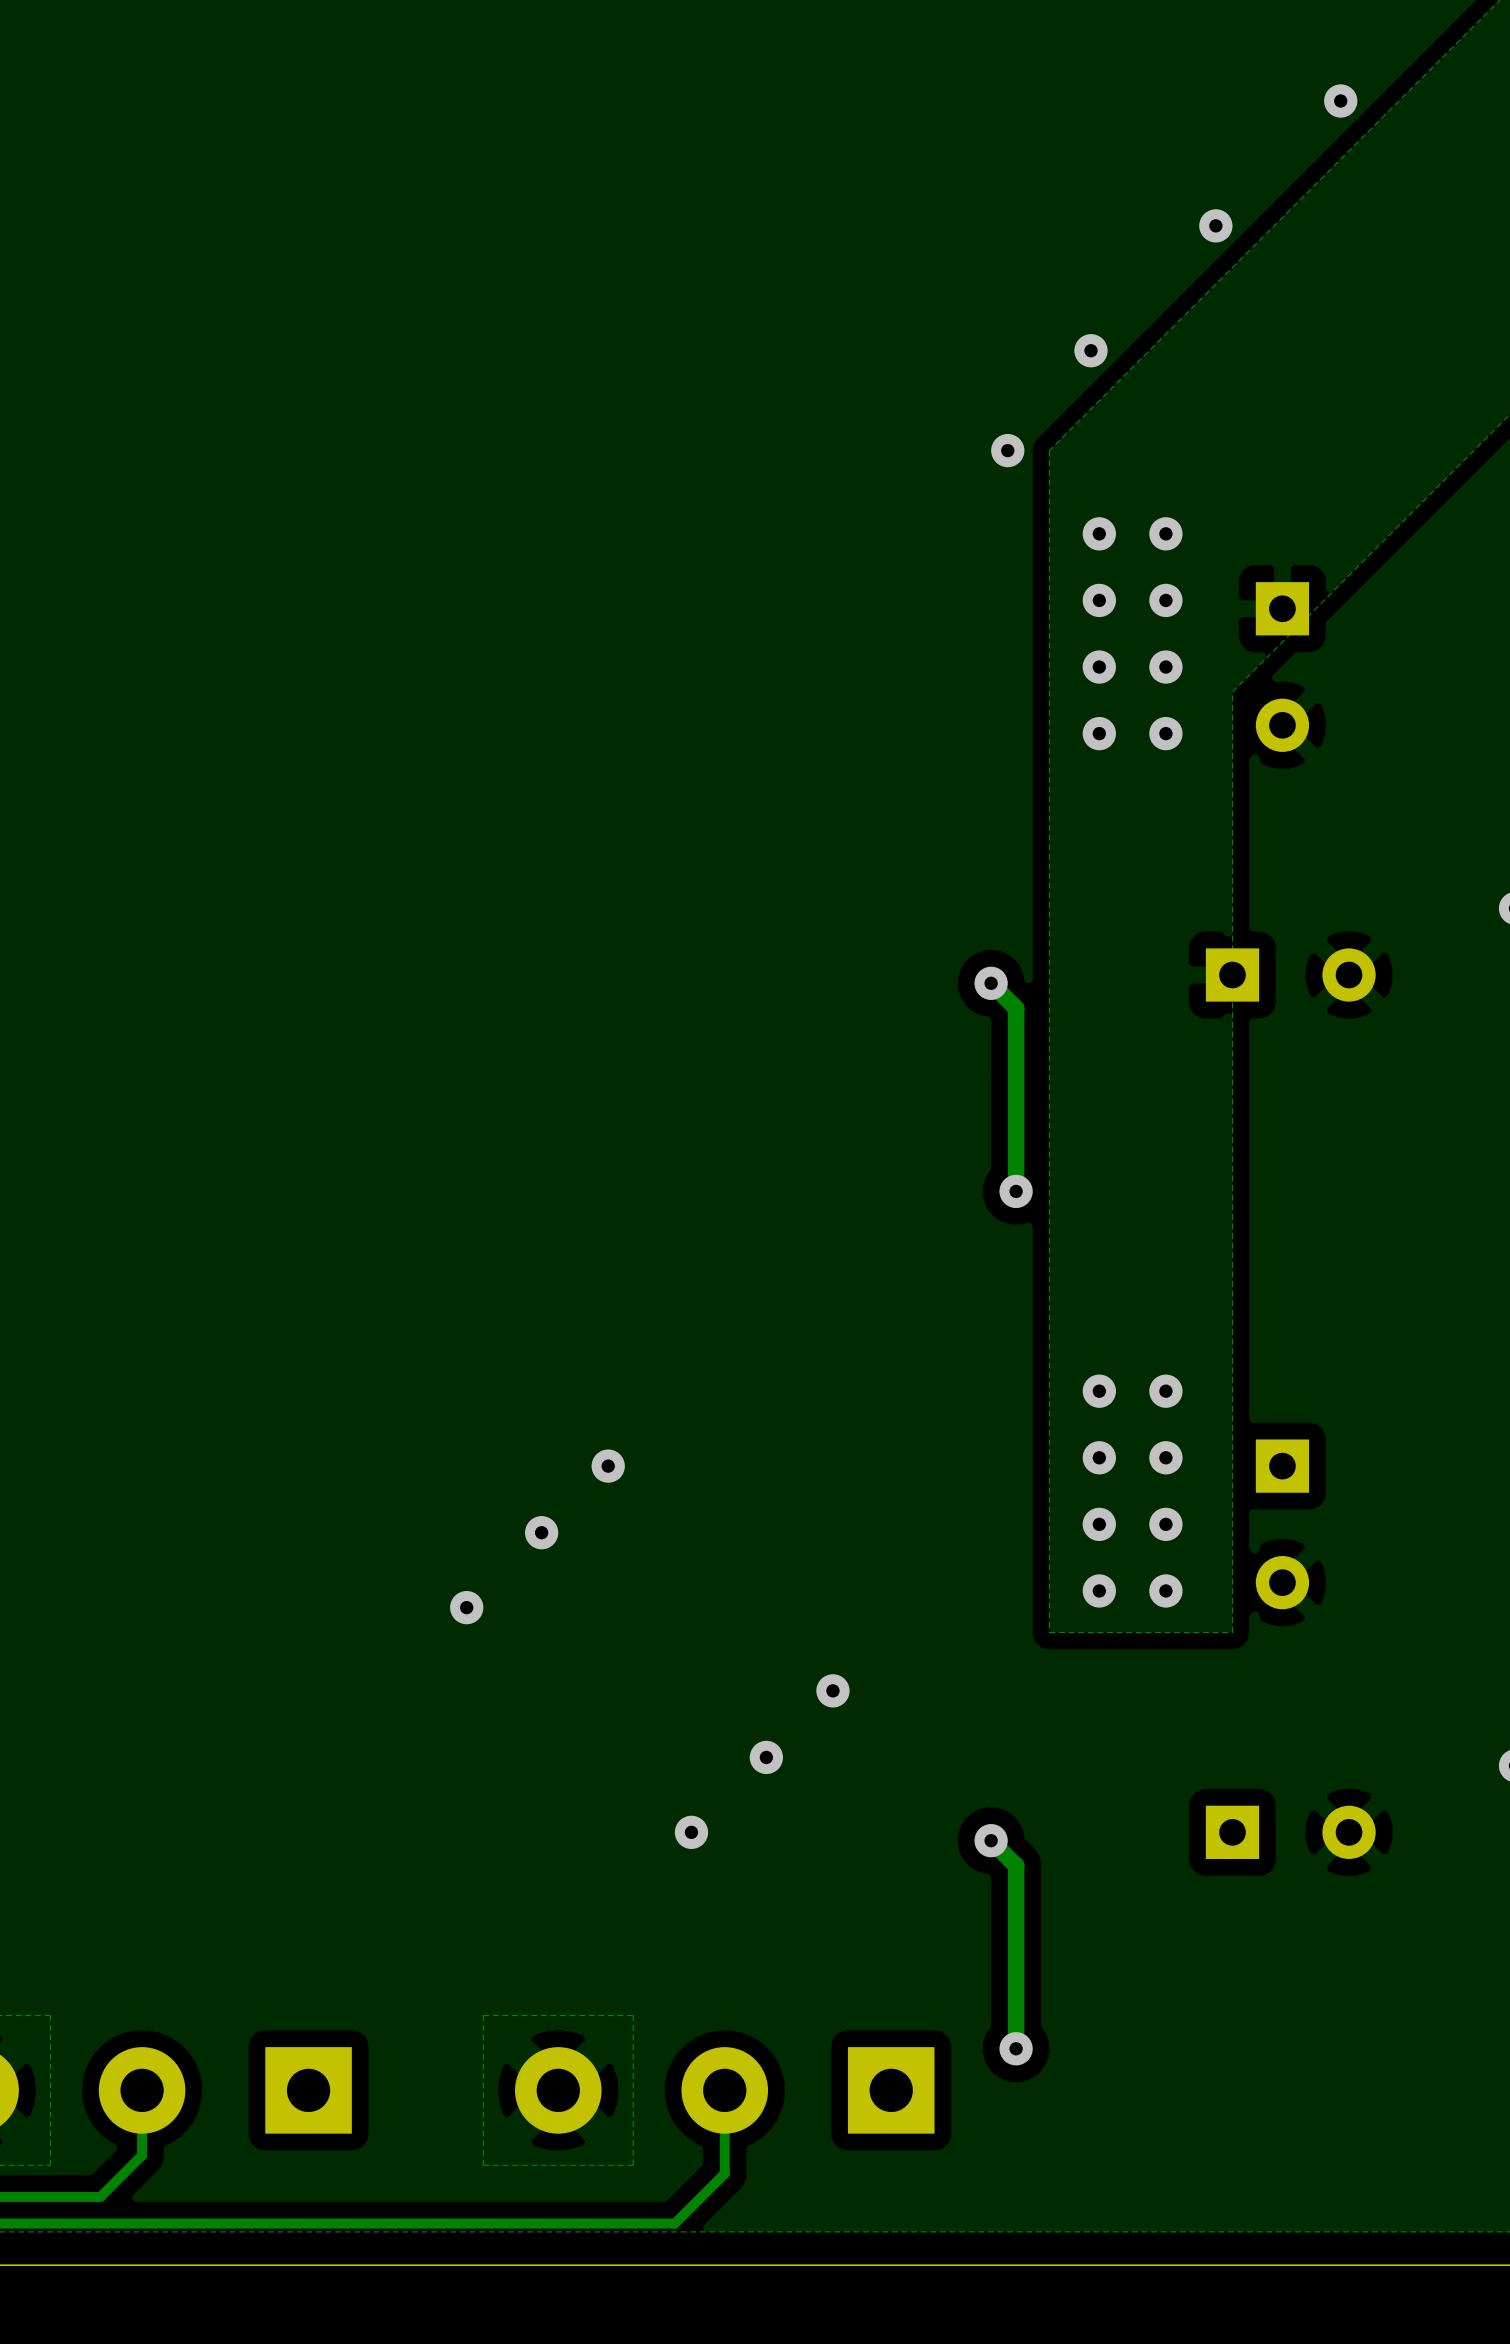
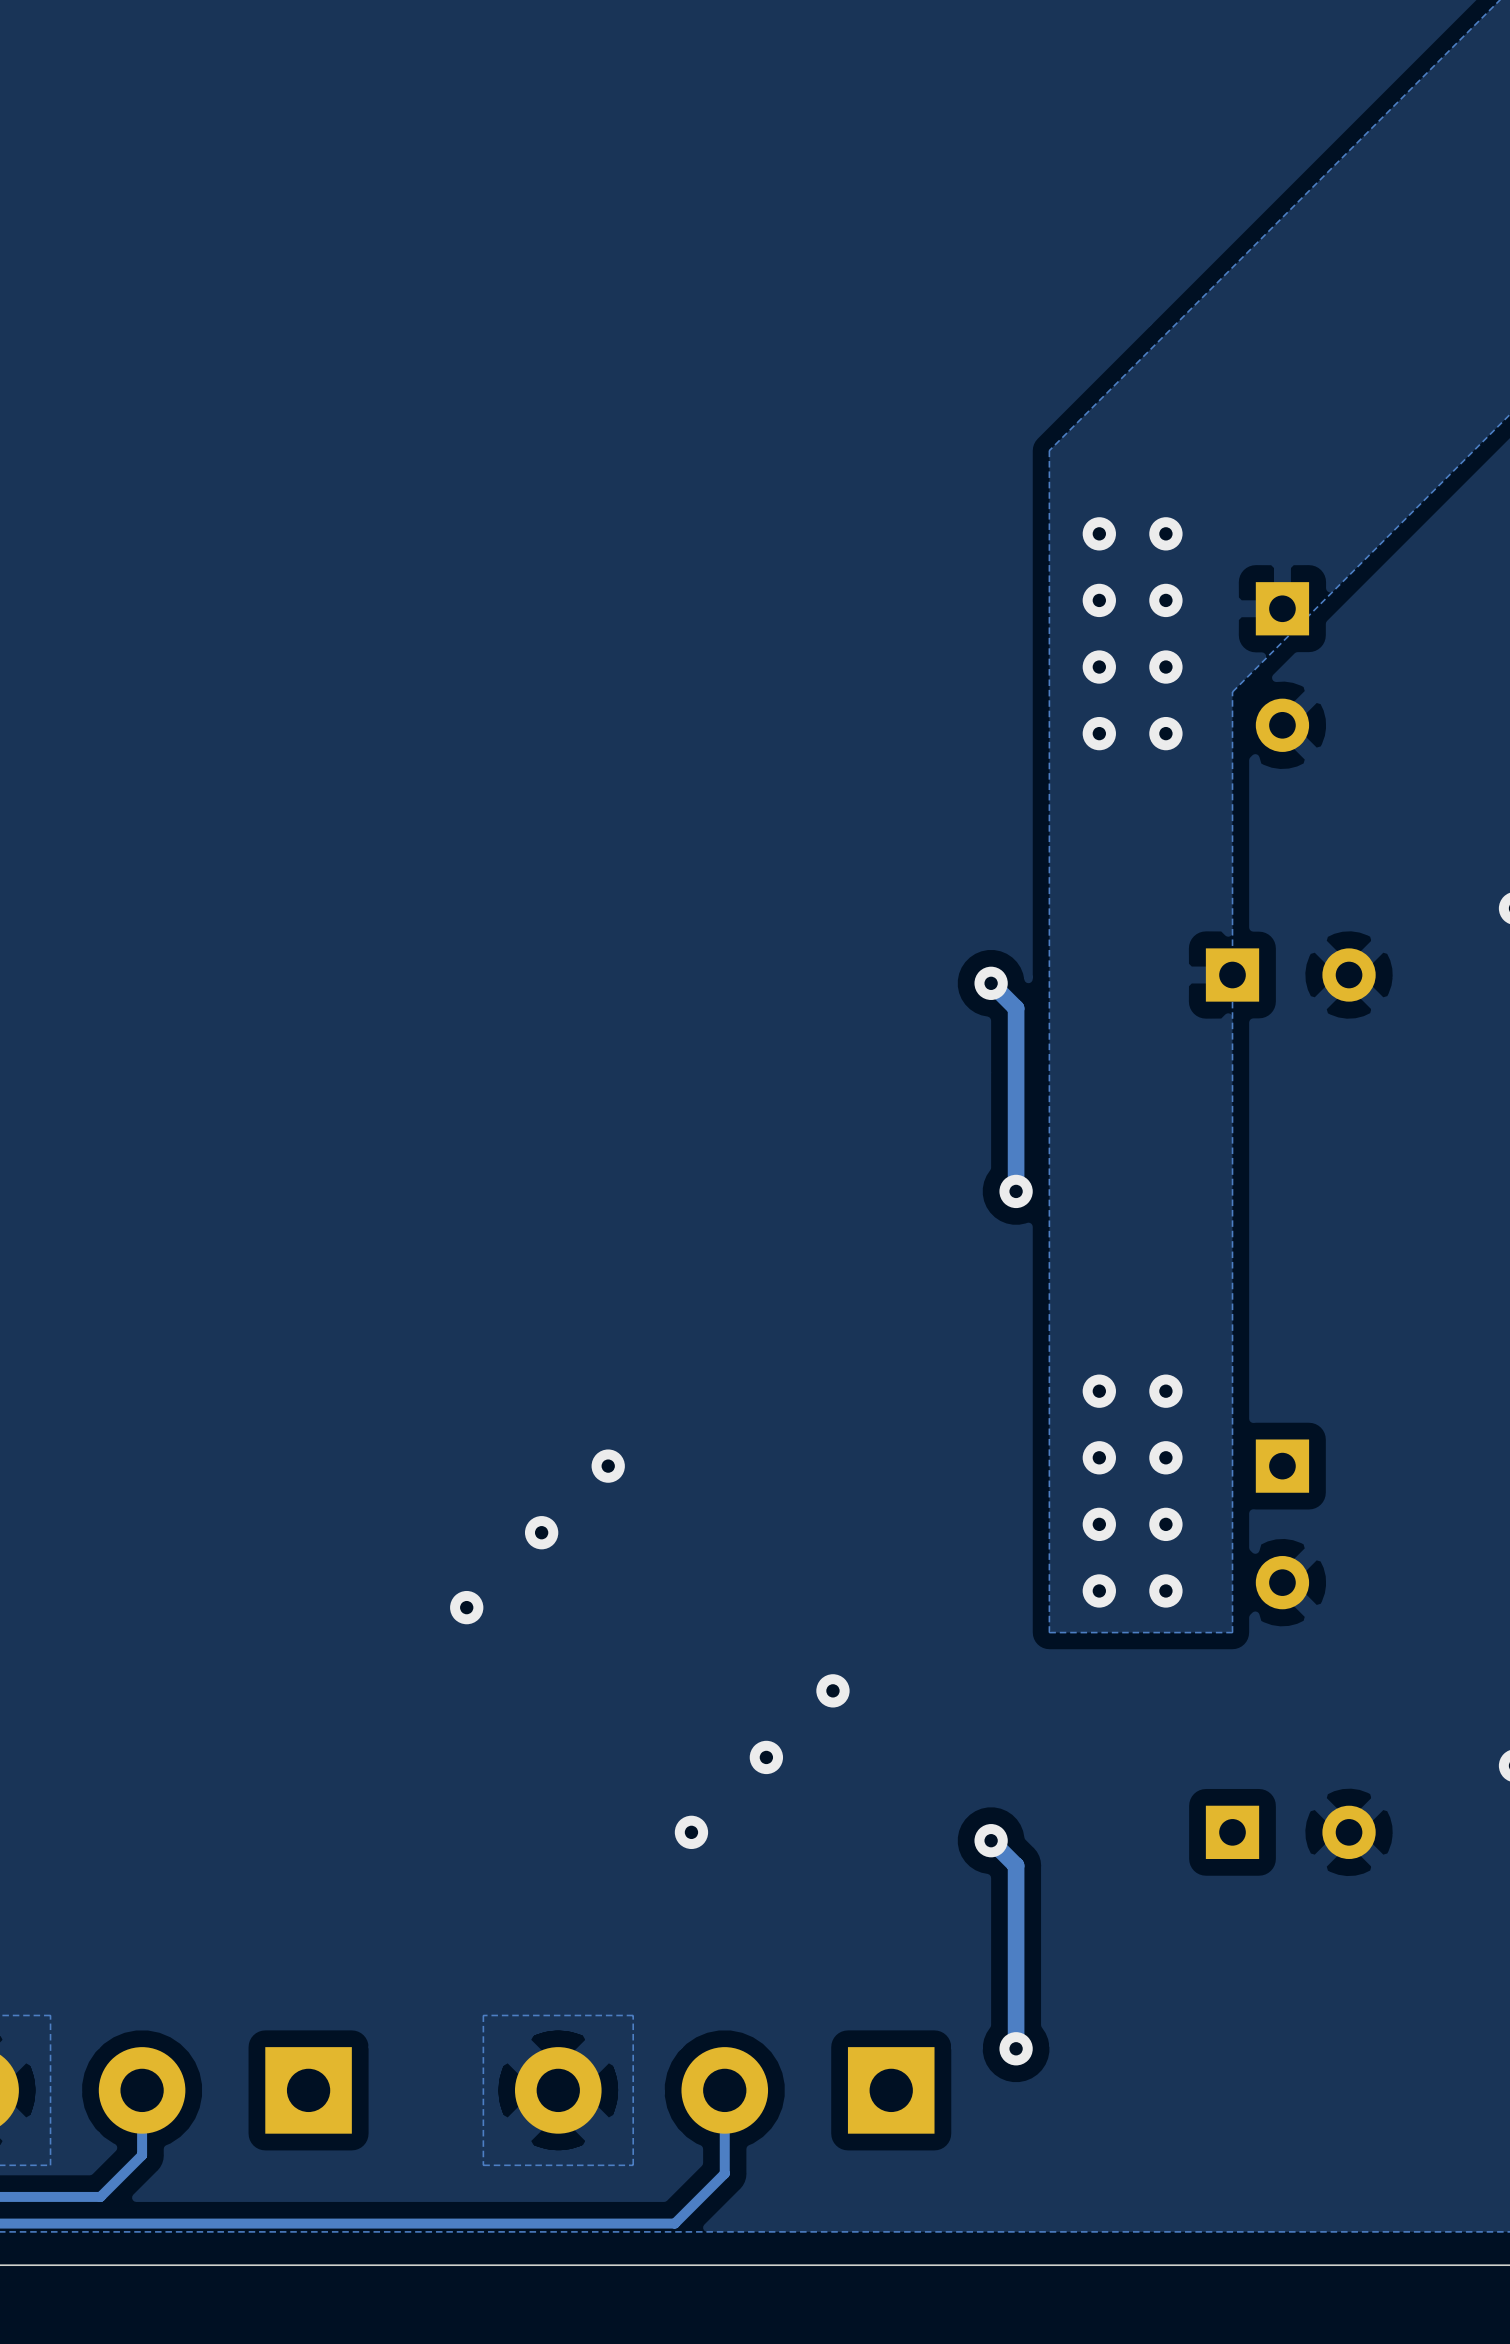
via: (1340, 101) -> none
via: (1215, 225) -> none
via: (1091, 350) -> none
via: (1007, 450) -> none

